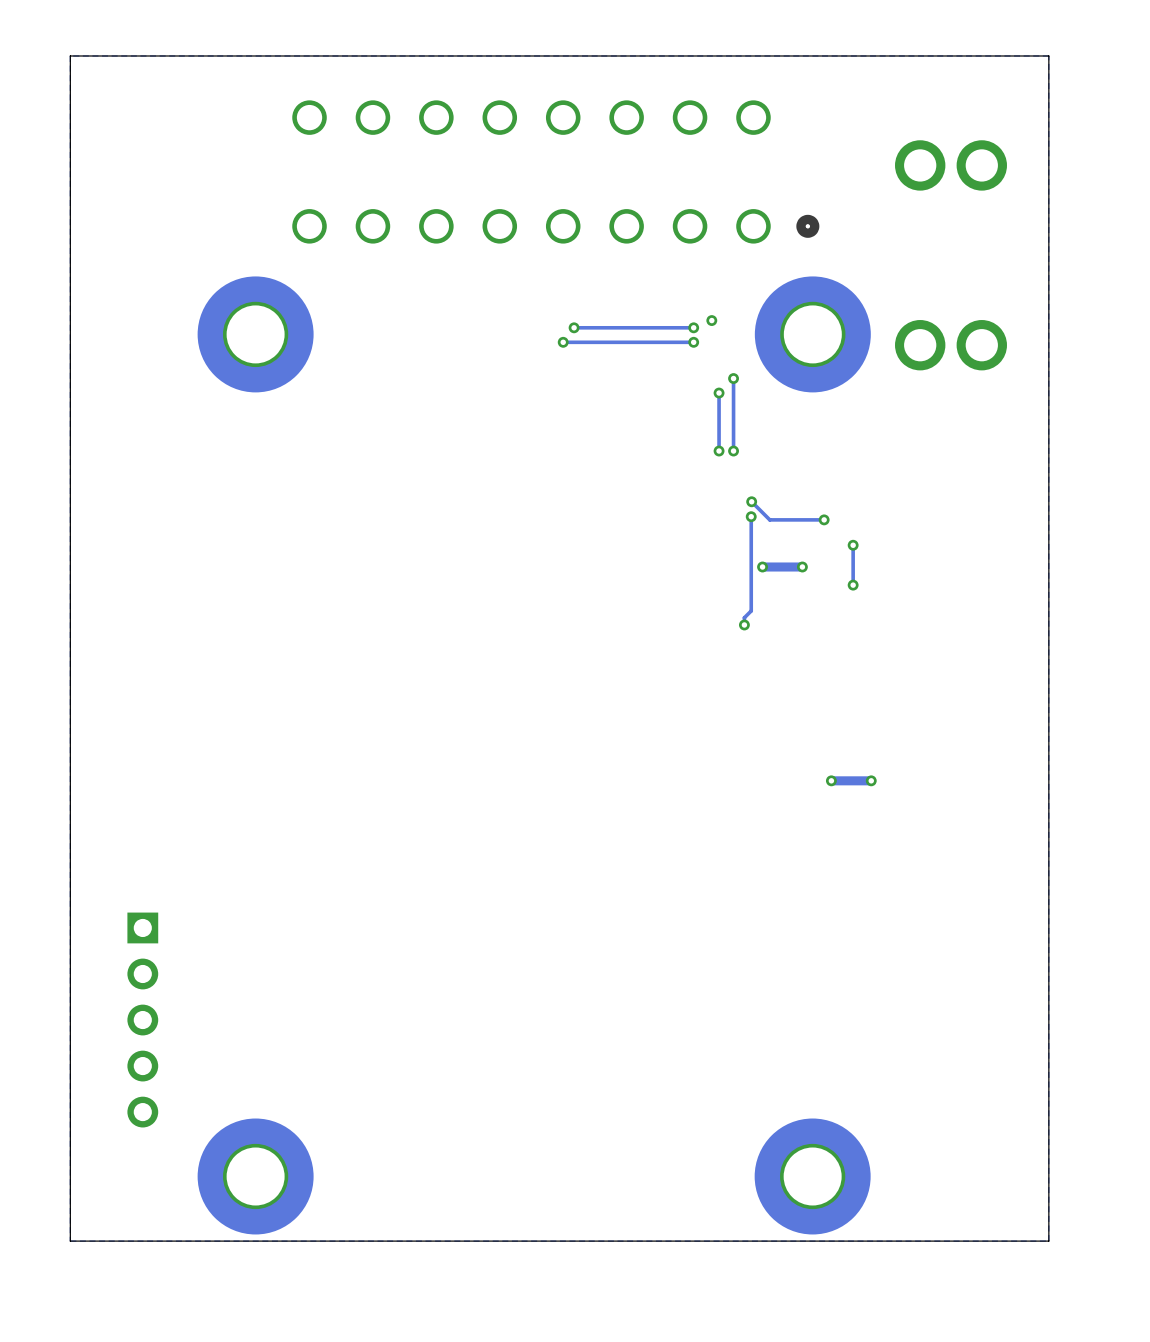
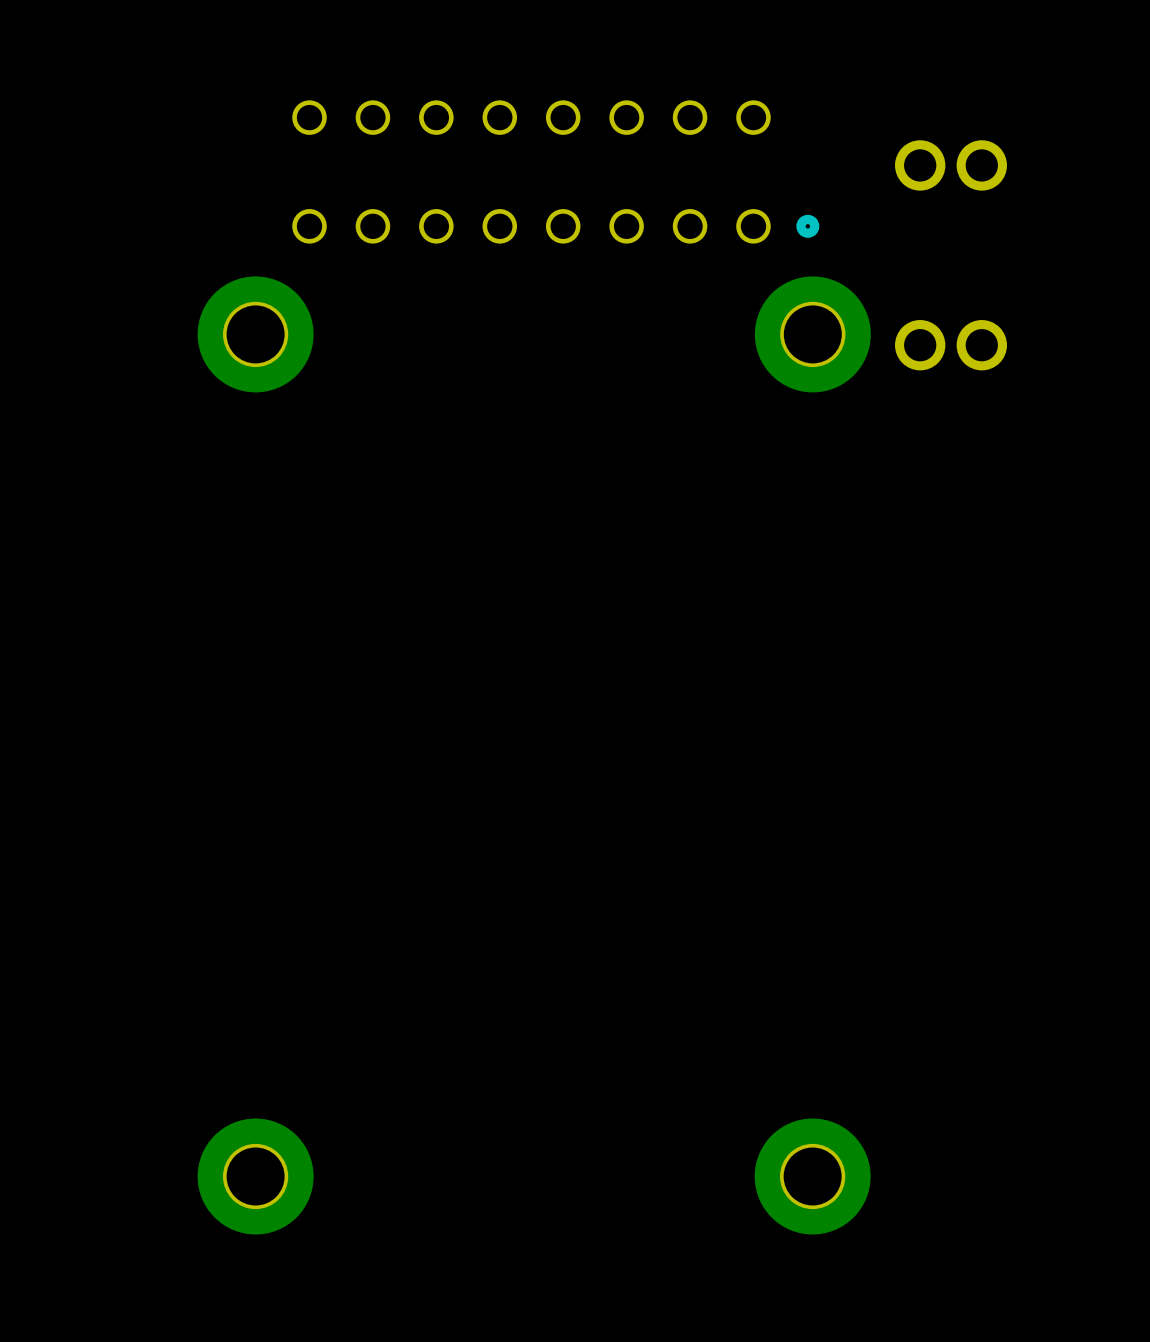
board edge: (1048, 55) (70, 55) (70, 1241) (1048, 1241) (1048, 55) -> none
via: (711, 320) -> none
via: (574, 327) -> none
track: (693, 327) (574, 327) -> none
via: (693, 327) -> none
via: (563, 342) -> none
track: (693, 342) (563, 342) -> none
via: (693, 342) -> none
track: (733, 378) (733, 451) -> none
via: (733, 378) -> none
track: (719, 393) (719, 451) -> none
via: (719, 393) -> none
via: (719, 451) -> none
via: (733, 451) -> none
track: (751, 501) (769, 519) (824, 519) -> none
via: (751, 501) -> none
track: (751, 516) (751, 610) (744, 617) (744, 624) -> none
via: (751, 516) -> none
via: (824, 519) -> none
track: (853, 545) (853, 585) -> none
via: (853, 545) -> none
via: (762, 567) -> none
track: (802, 567) (762, 567) -> none
via: (802, 567) -> none
via: (853, 585) -> none
via: (744, 624) -> none
via: (831, 780) -> none
track: (871, 780) (831, 780) -> none
via: (871, 780) -> none
part: (142, 1020) -> none

